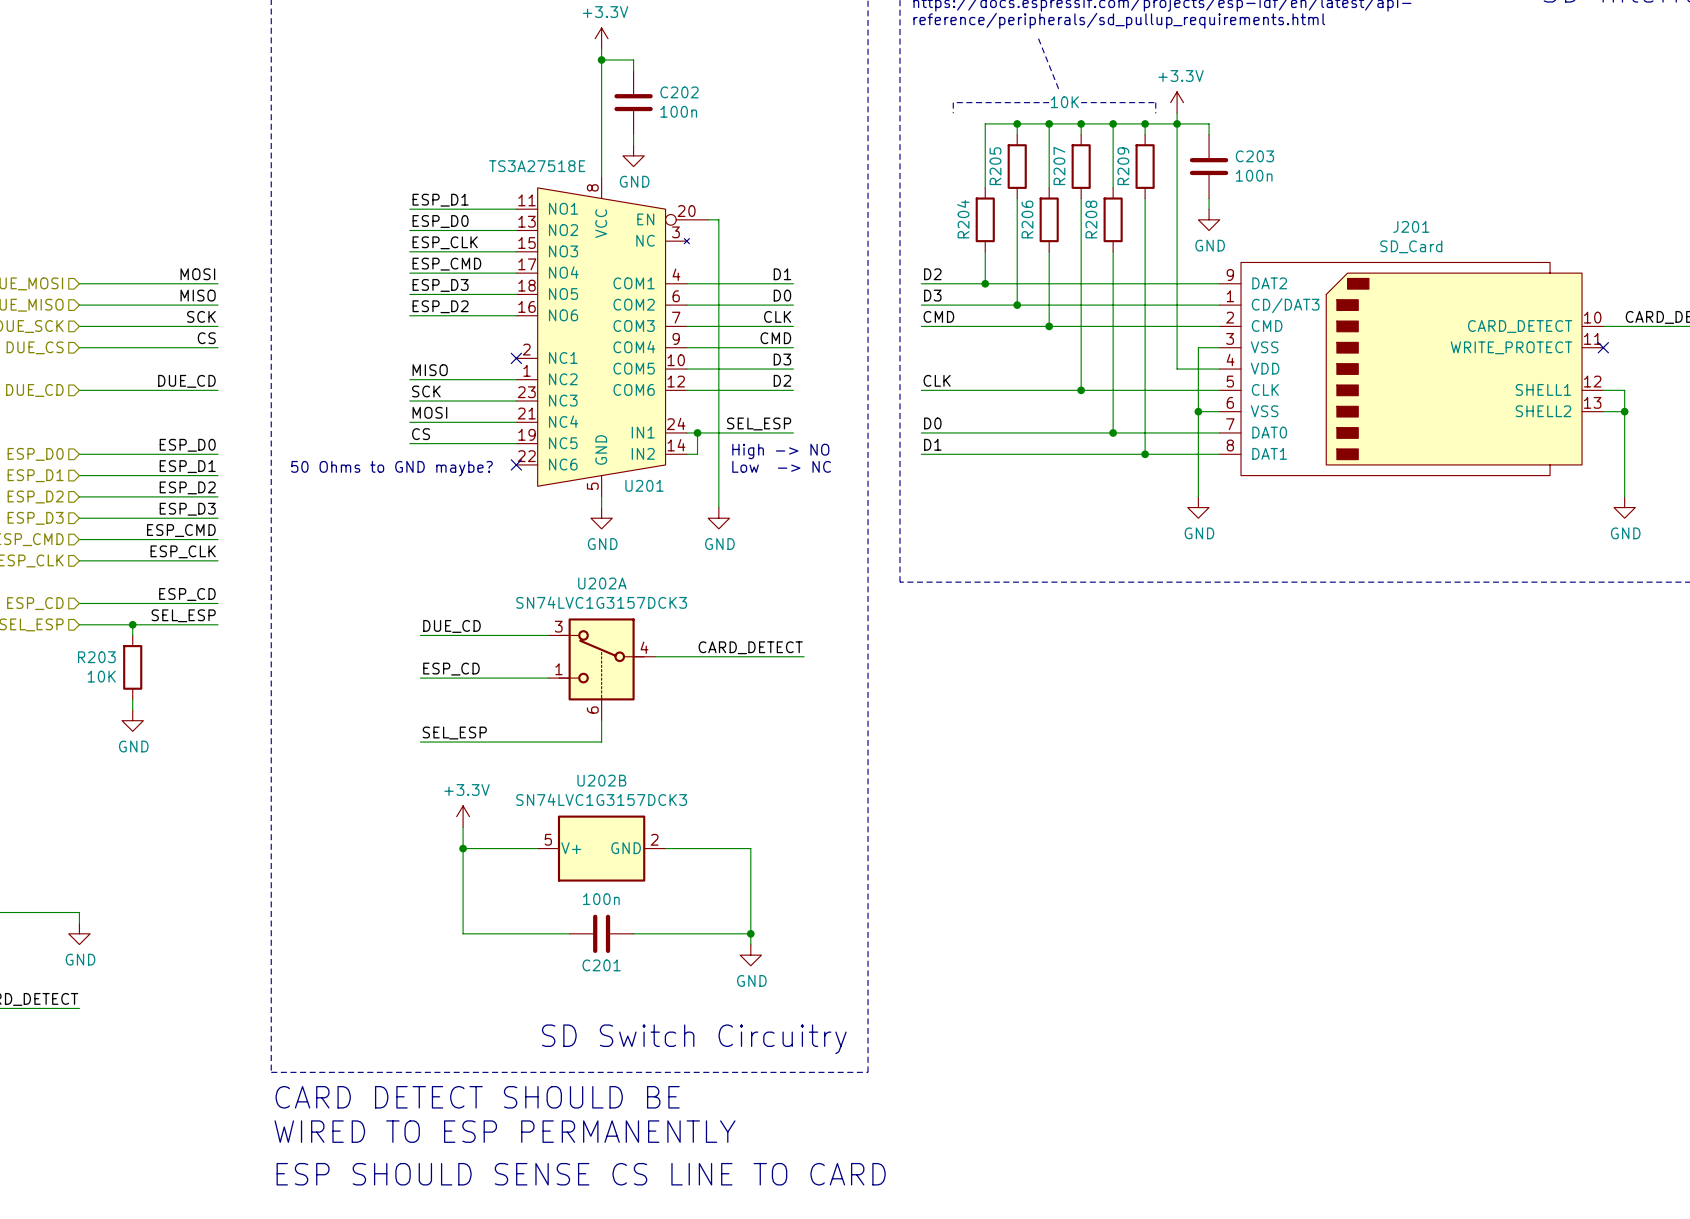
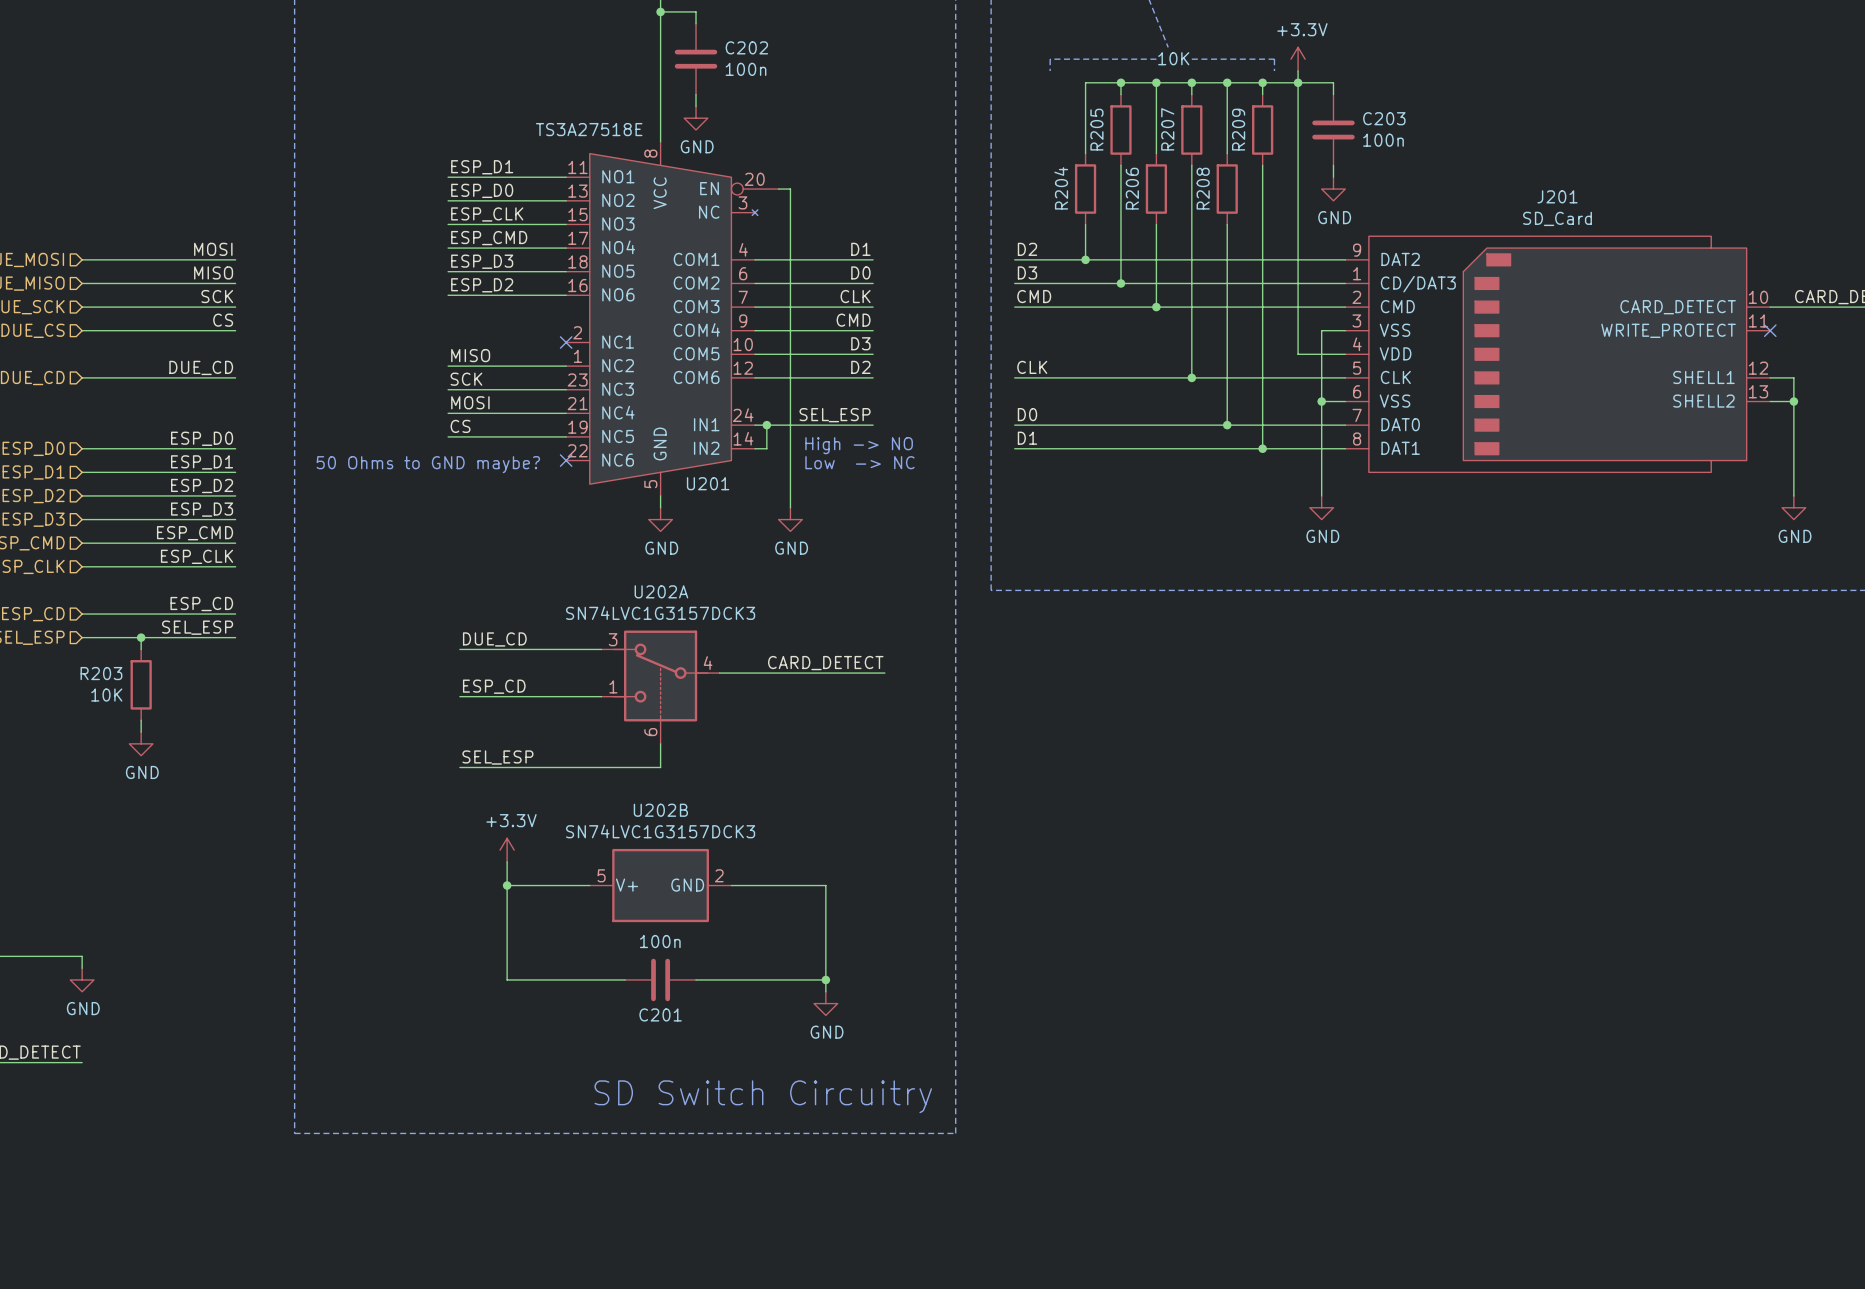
text: CARD DETECT SHOULD BE (477, 1097) -> none
text: WIRED TO ESP PERMANENTLY (505, 1131) -> none
text: ESP SHOULD SENSE CS LINE TO CARD (581, 1174) -> none

